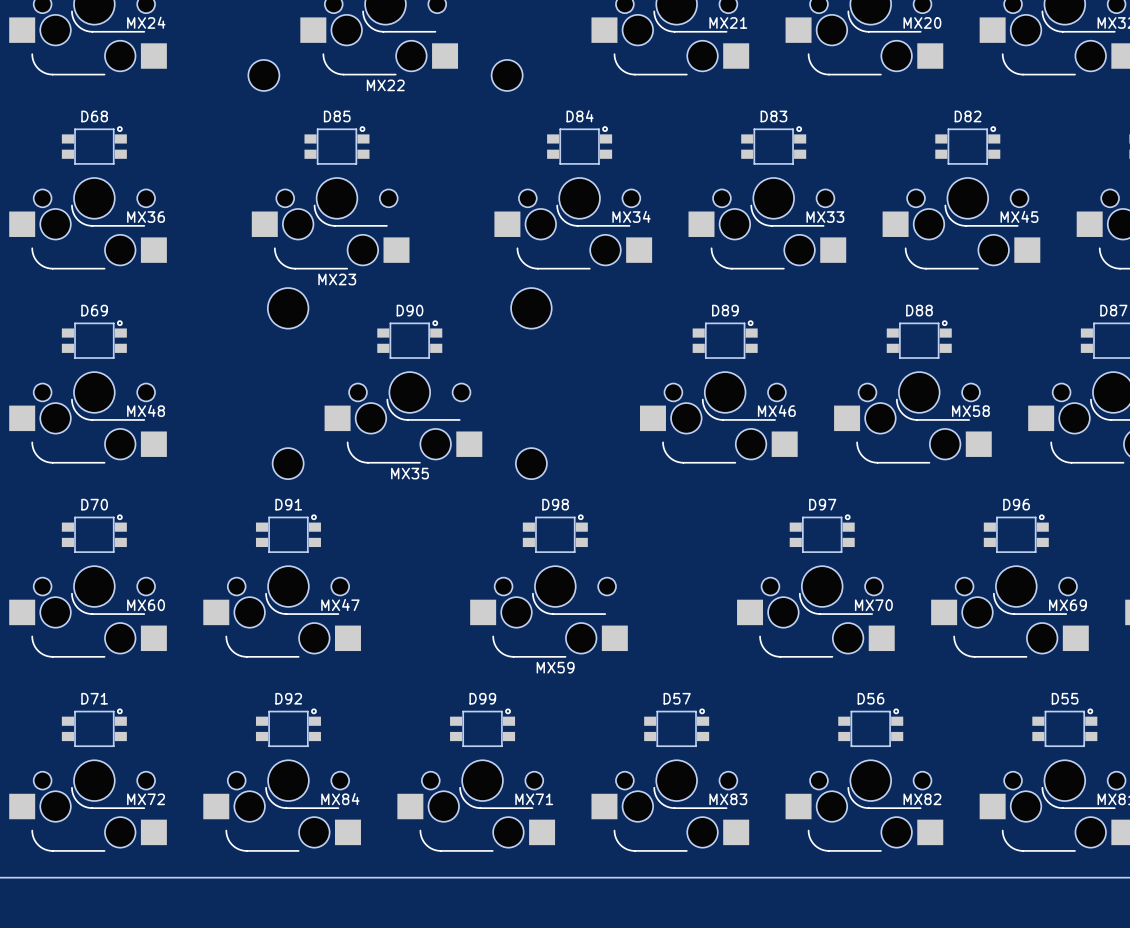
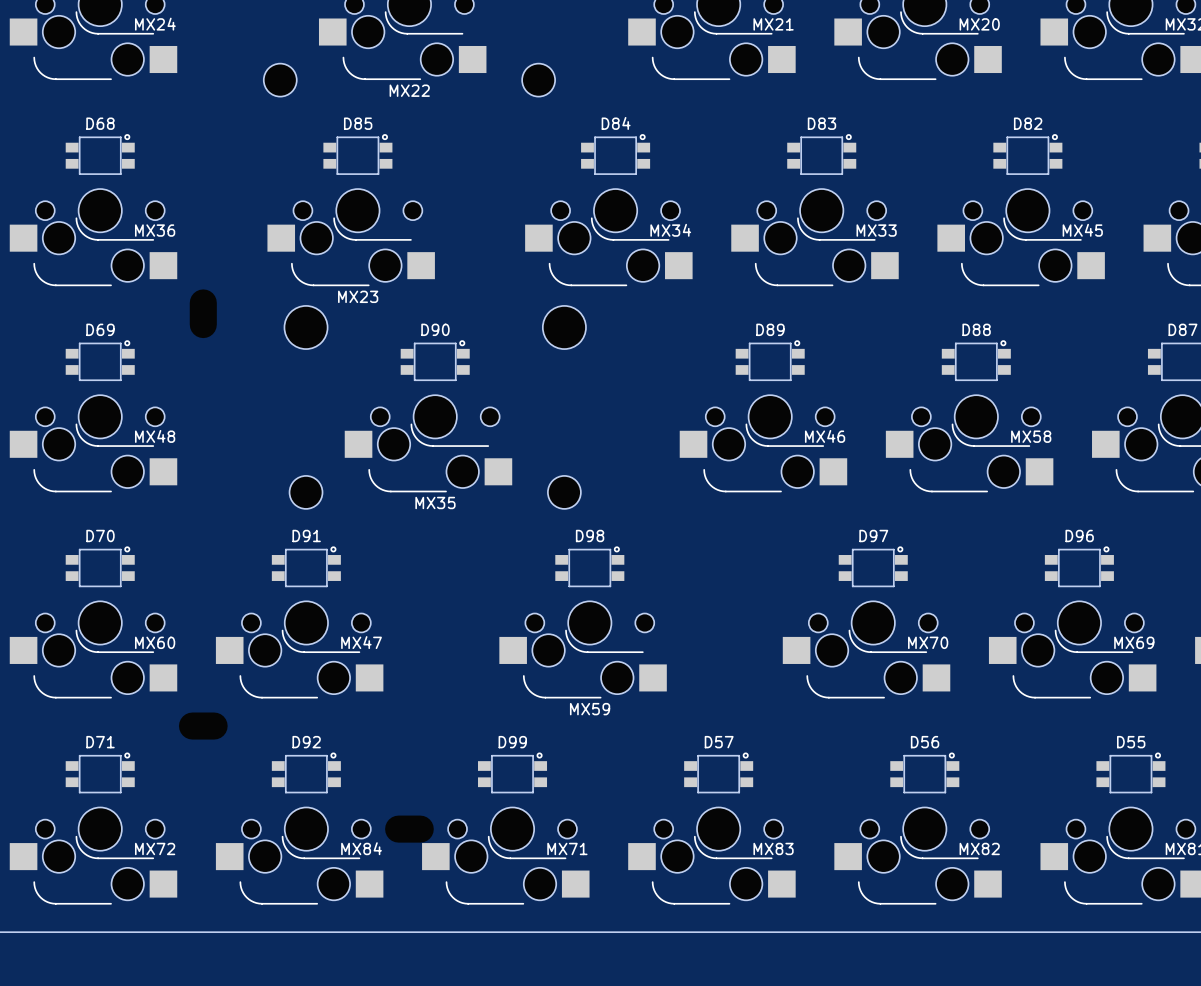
part: none -> (203, 313)
part: none -> (203, 726)
part: none -> (409, 829)

